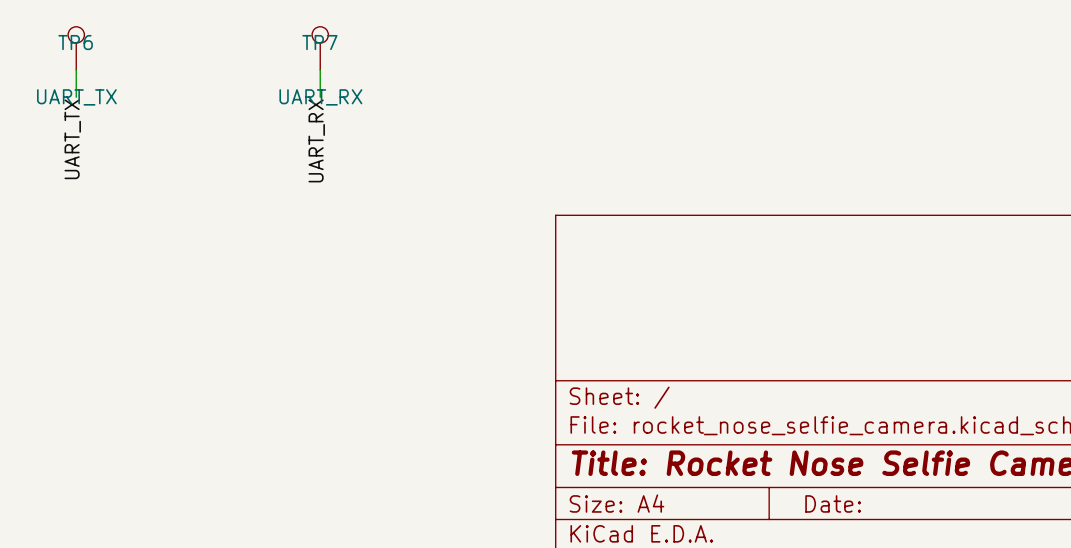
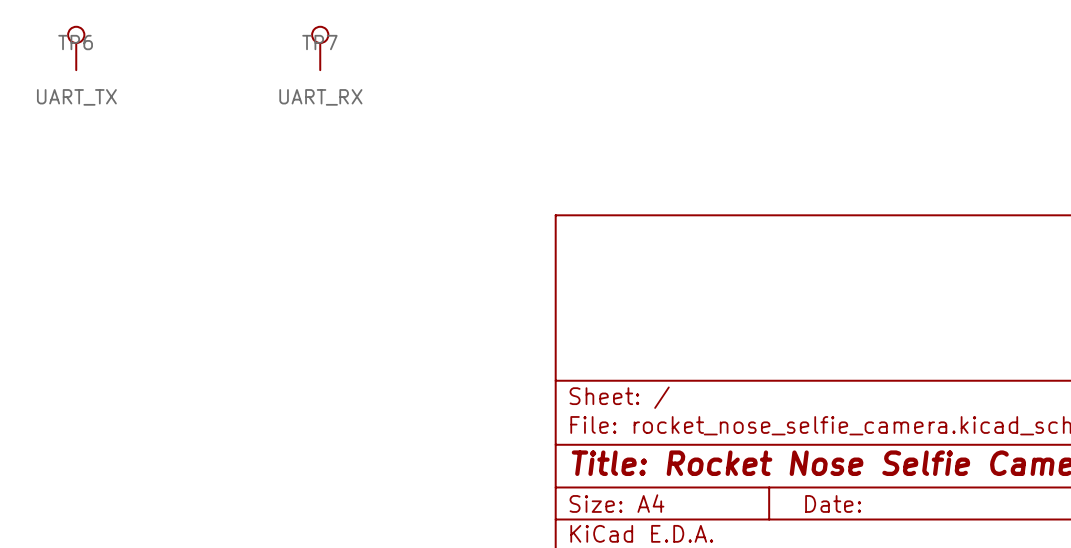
wire: (76, 70) (76, 97) -> none
wire: (320, 70) (320, 97) -> none
label: UART_TX (72, 139) -> none
label: UART_RX (316, 140) -> none

